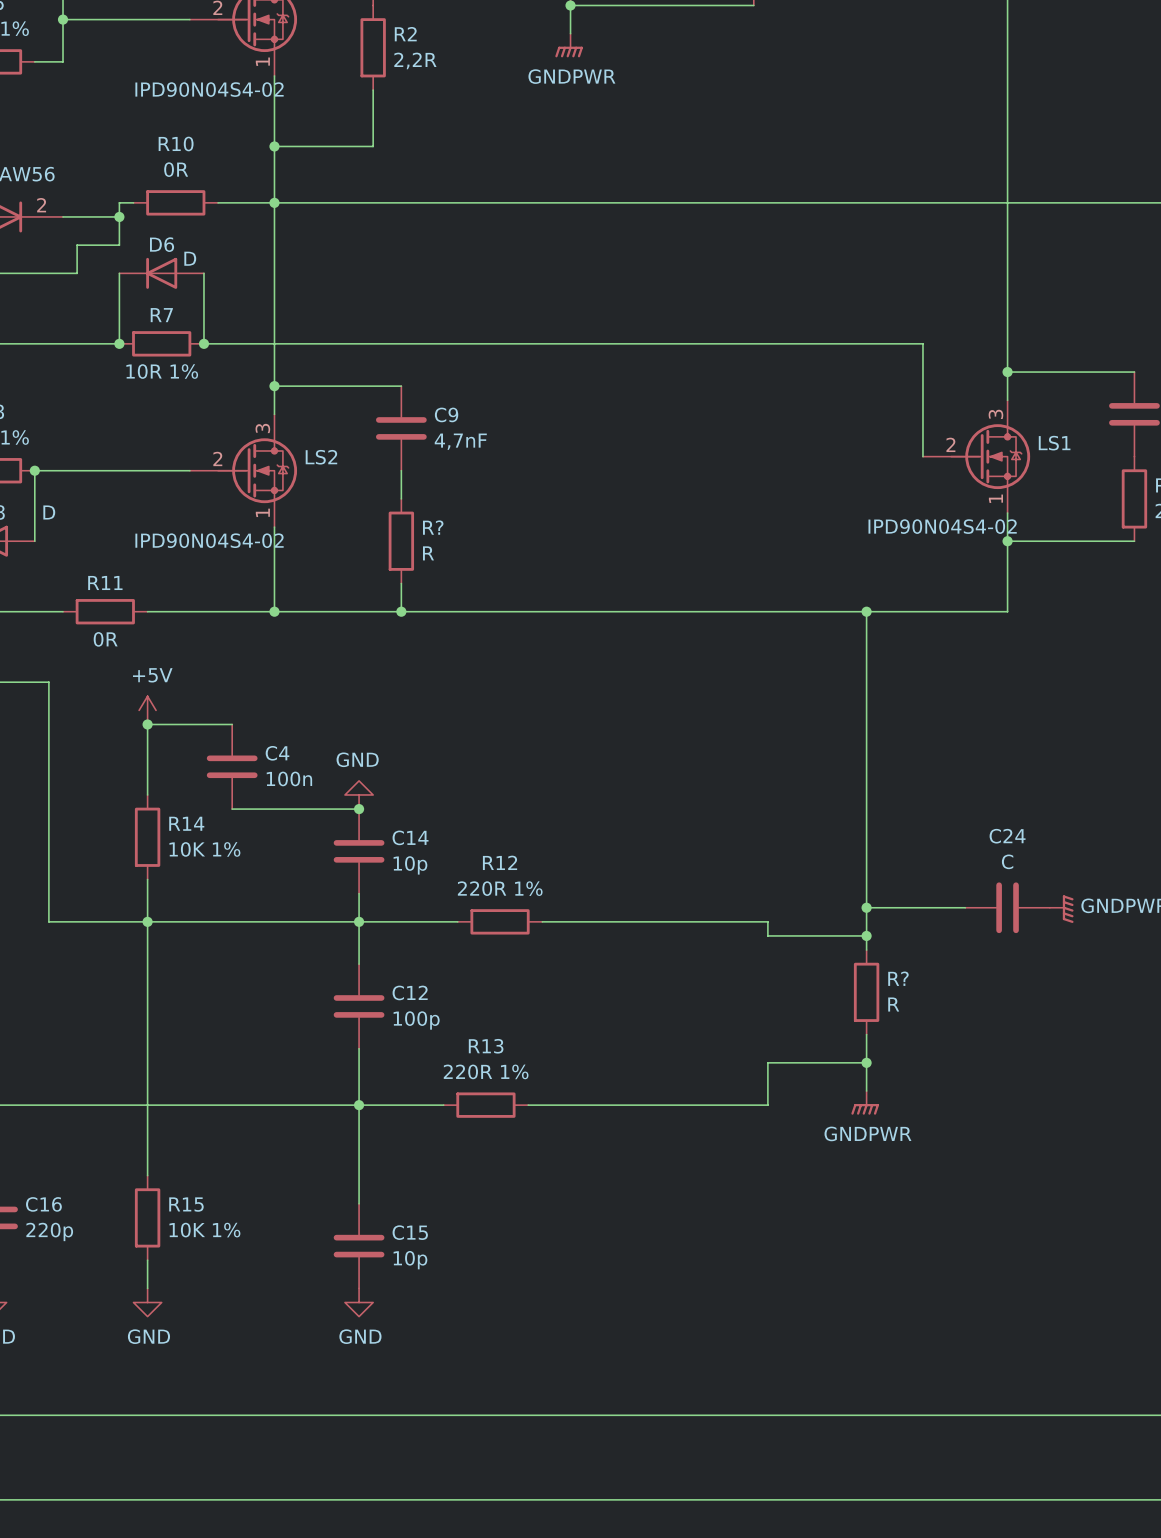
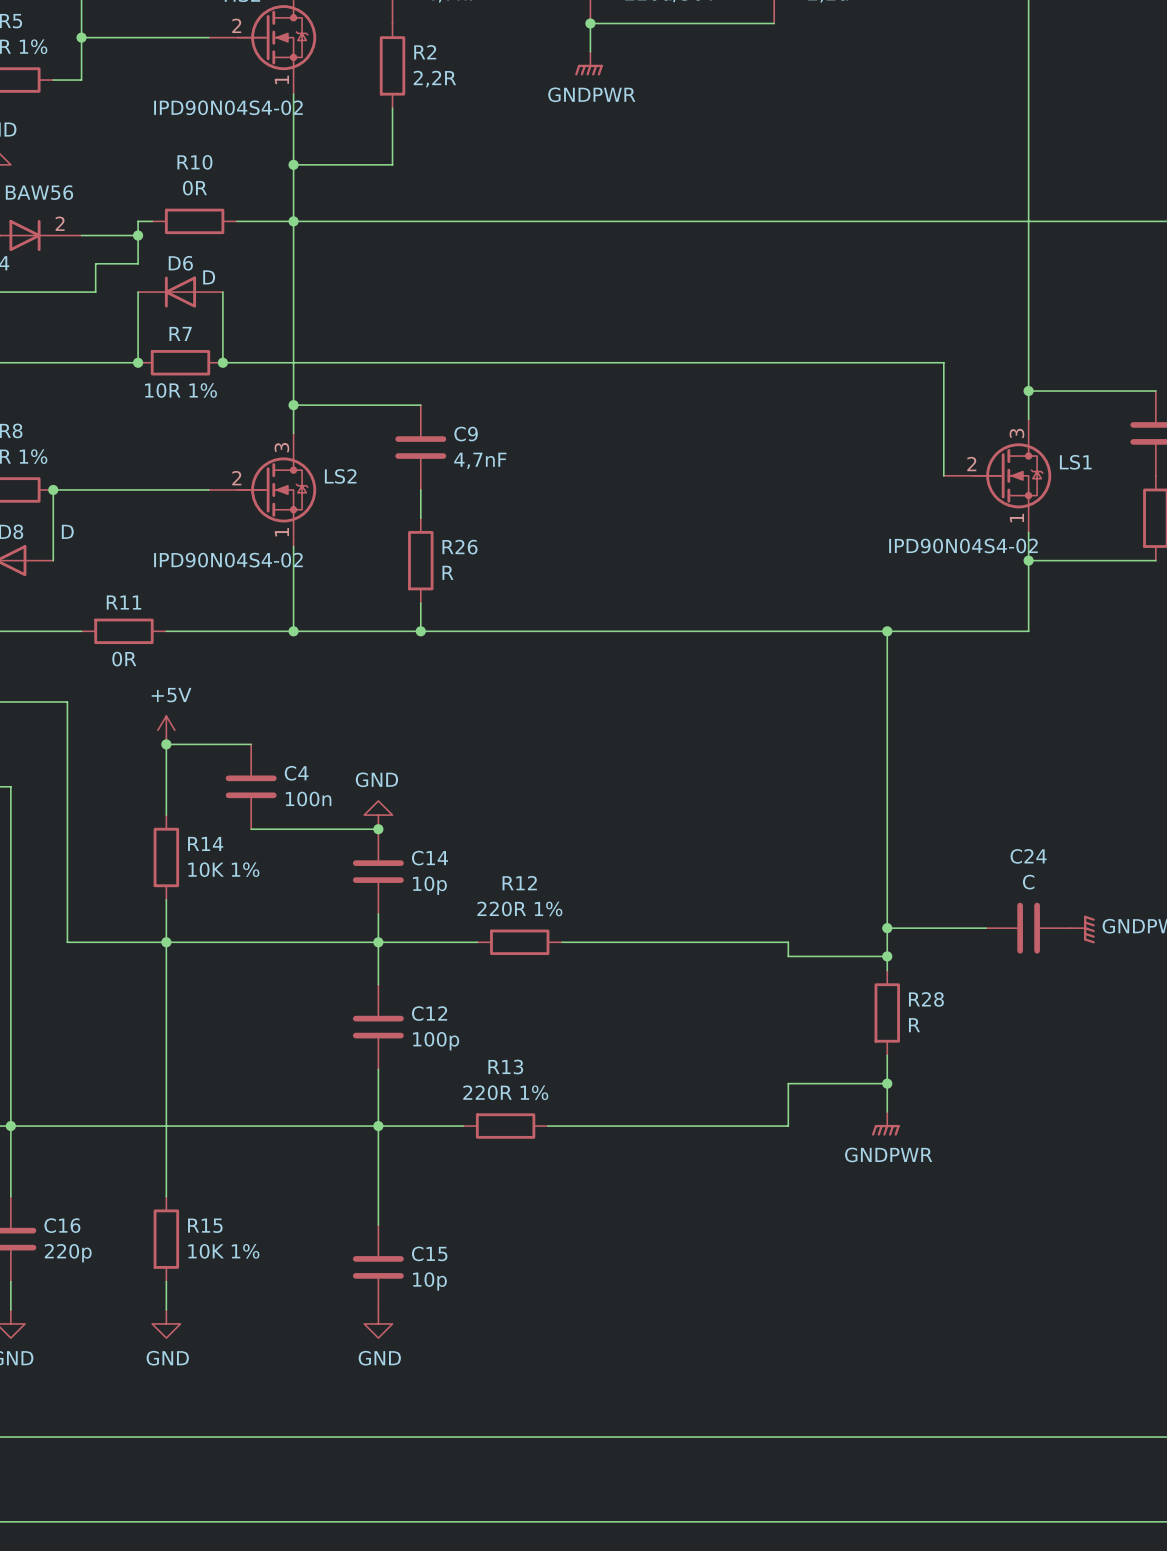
R? name: R? (433, 527) -> R26 (459, 547)
R? name: R? (898, 978) -> R28 (926, 999)

